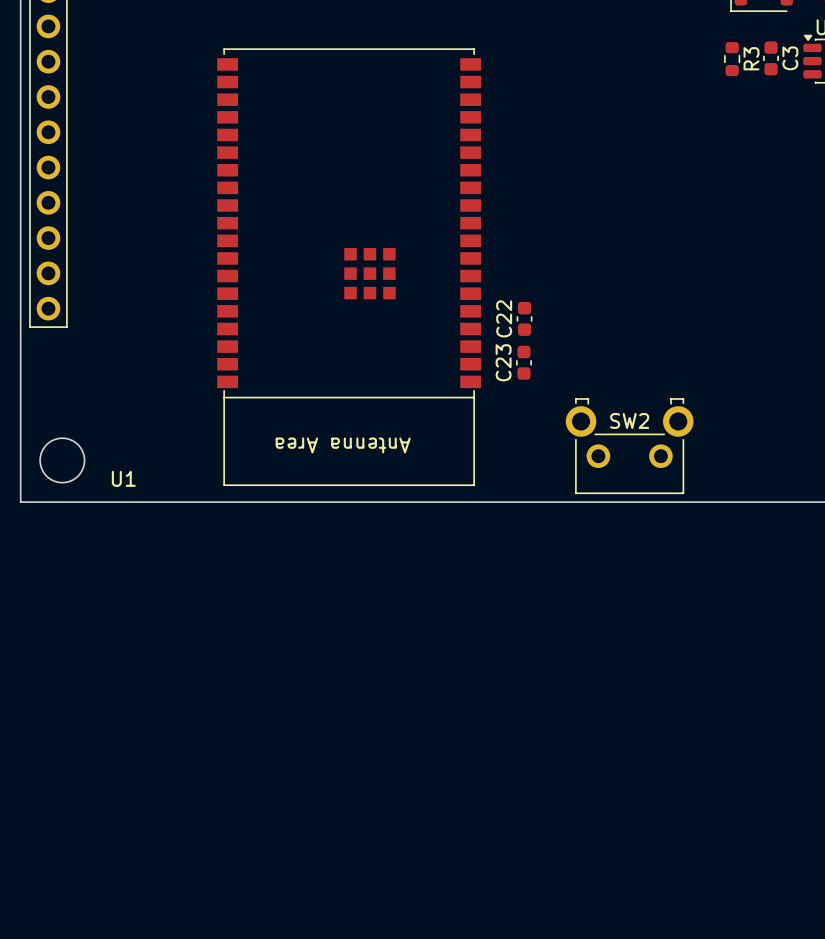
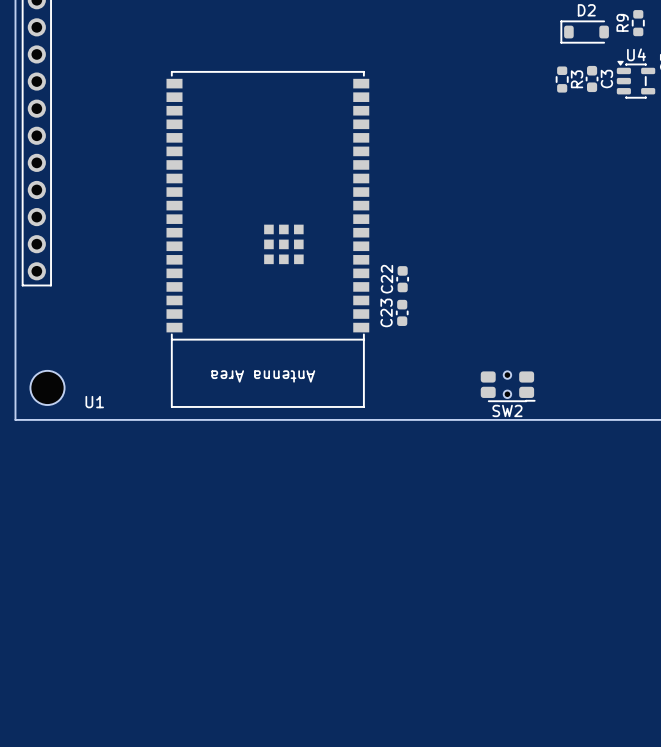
SW2 footprint: [565, 398, 694, 495] -> [480, 371, 536, 402]
SW2 name position: SW2 (629, 420) -> SW2 (507, 410)

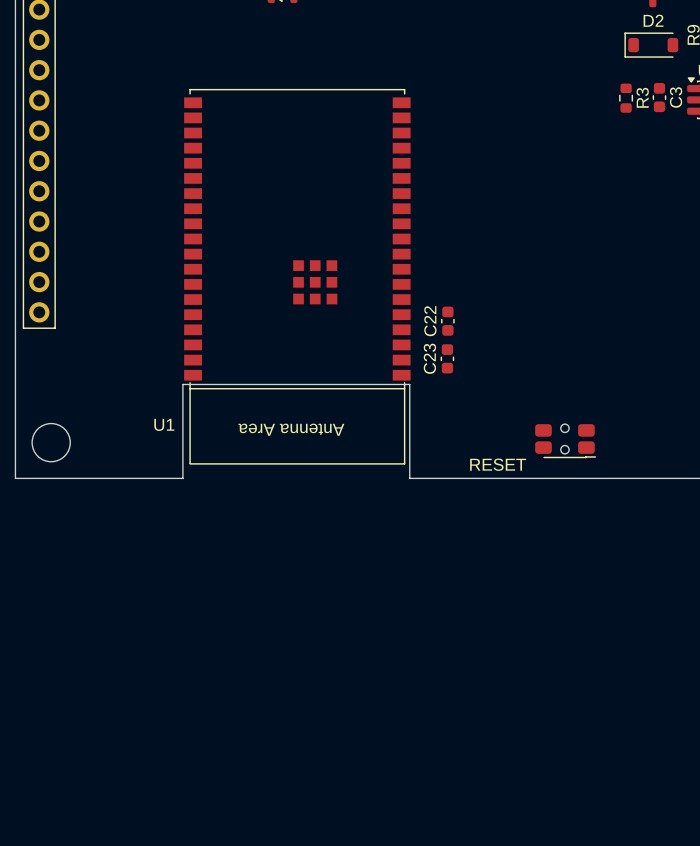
U1 name position: U1 (94, 402) -> U1 (164, 424)
SW2 value: none -> RESET (498, 464)
SW2 name: SW2 (507, 410) -> none
board edge: (165, 419) (368, 419) -> (182, 478) (182, 384) (409, 384) (409, 478)

